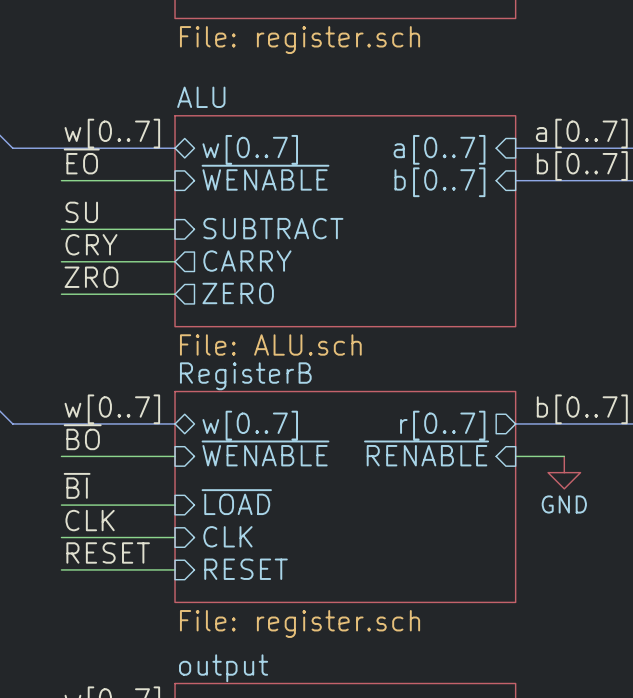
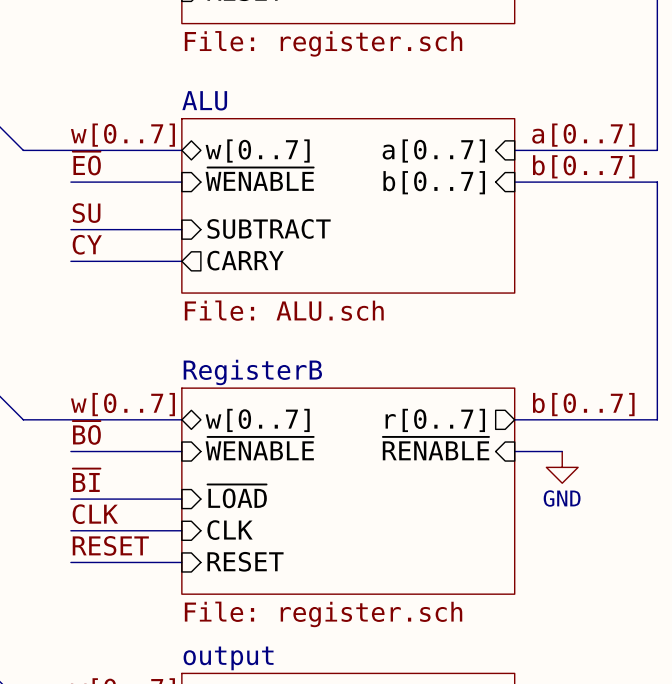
sheet ALU: none -> File: ALU.sch (348, 205)
sheet ALU: File: ALU.sch (345, 221) -> none
label: CRY (91, 244) -> CY (87, 244)
label: ZRO (91, 277) -> none
sheet pin: ZERO (238, 293) -> none
wire: (61, 294) (175, 294) -> none

